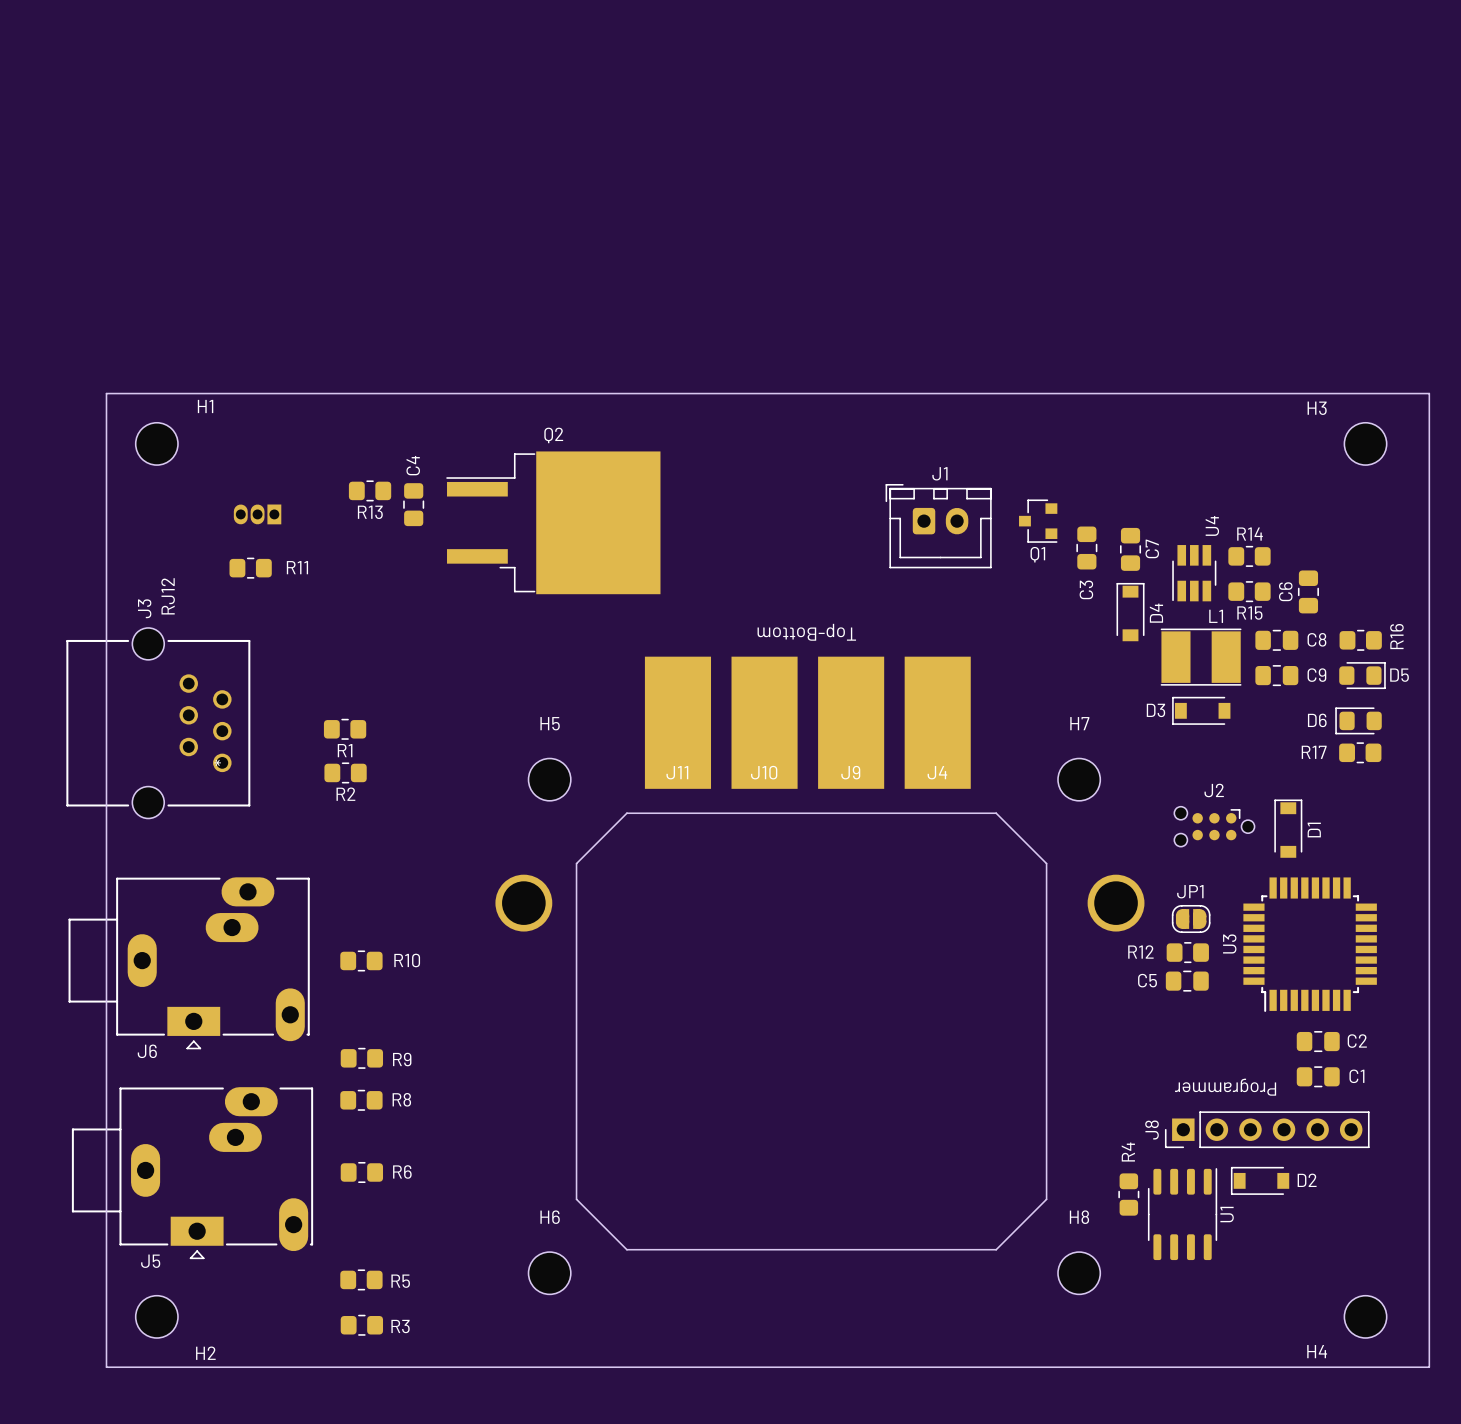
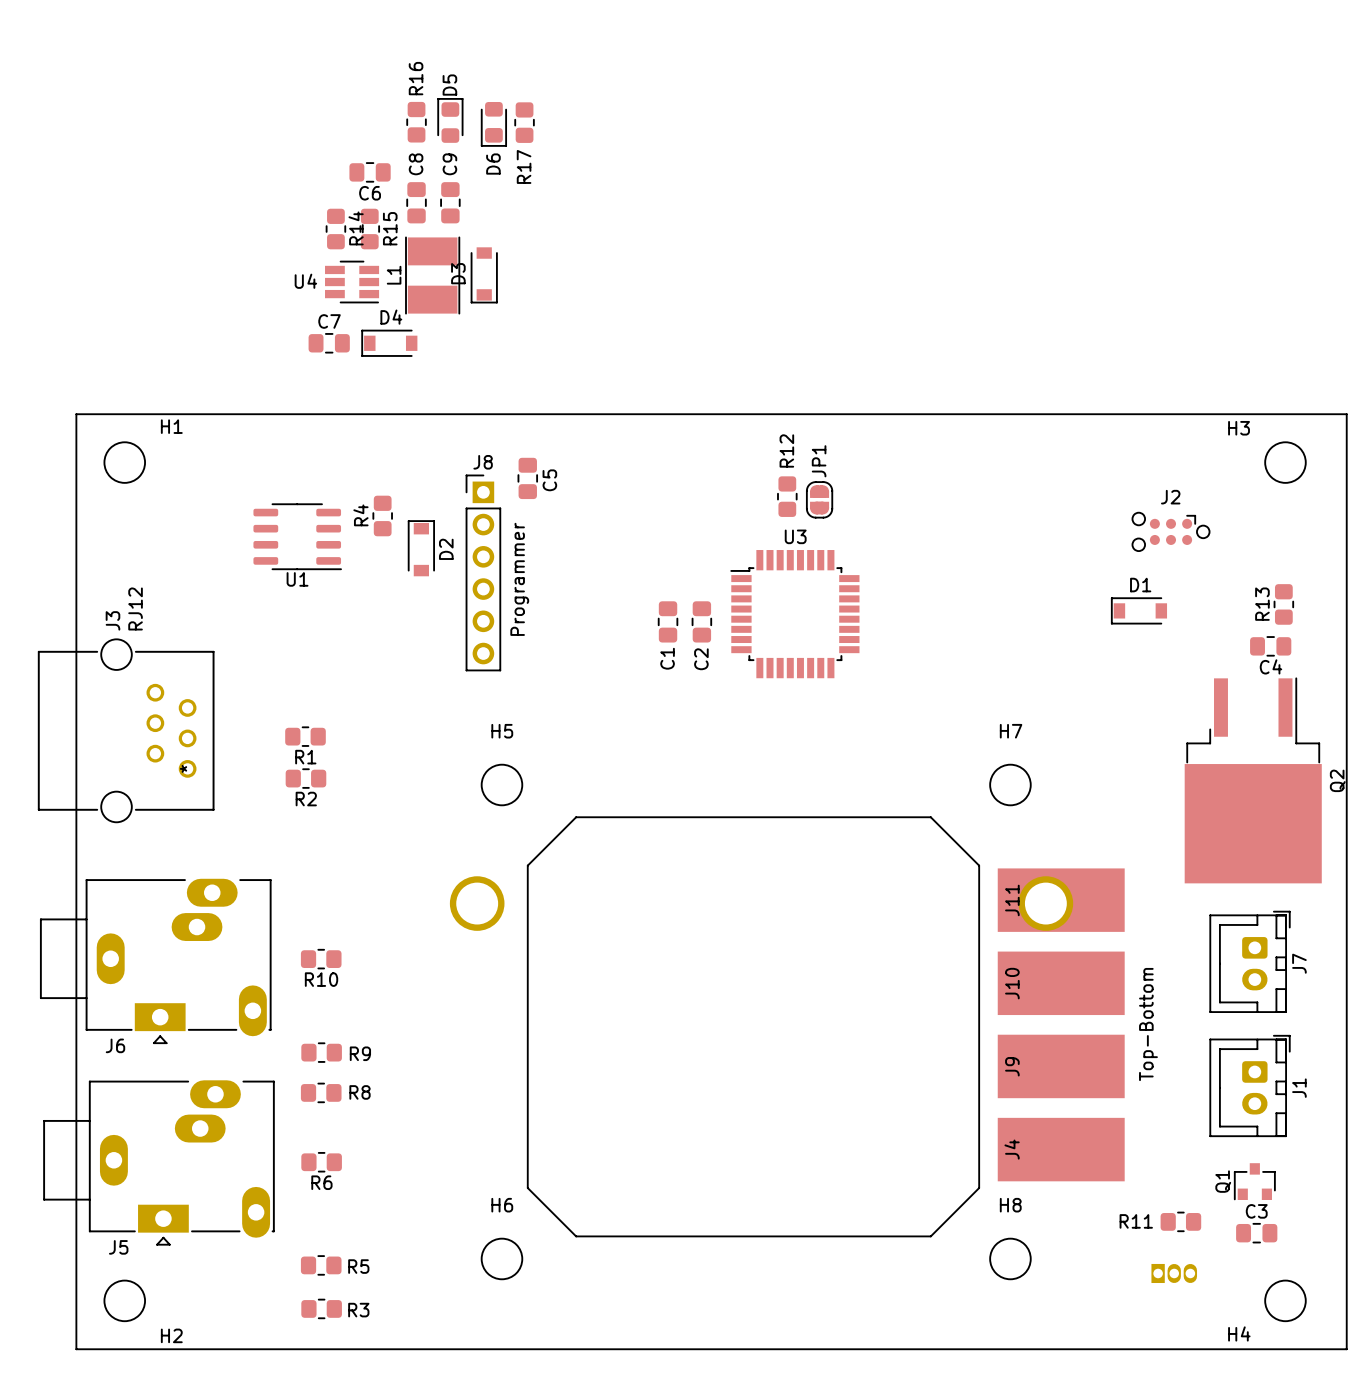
C4 name position: C4 (413, 465) -> C4 (1270, 666)
R13 rotation: 0° (370, 490) -> 90° clockwise (1283, 604)
R13 position: (370, 490) -> (1283, 604)
C4 rotation: 0° (413, 504) -> 90° clockwise (1270, 646)
C4 position: (413, 504) -> (1270, 646)
part: (257, 514) -> none
Q1 rotation: 0° (1038, 521) -> 90° clockwise (1254, 1181)
Q1 position: (1038, 521) -> (1254, 1181)
Q2 rotation: 0° (553, 522) -> 90° clockwise (1253, 780)
Q2 position: (553, 522) -> (1253, 780)
J1 rotation: 0° (938, 526) -> 90° clockwise (1250, 1085)
J1 position: (938, 526) -> (1250, 1085)
C3 rotation: 0° (1086, 548) -> 90° clockwise (1256, 1233)
C3 position: (1086, 548) -> (1256, 1233)
C7 name position: C7 (1152, 548) -> C7 (329, 321)
C7 rotation: 0° (1130, 549) -> 90° clockwise (329, 343)
C7 position: (1130, 549) -> (329, 343)
R14 rotation: 0° (1249, 556) -> 90° clockwise (335, 229)
R14 position: (1249, 556) -> (335, 229)
text: none -> Programmer (519, 579)
R11 name position: R11 (297, 567) -> R11 (1136, 1221)
R11 position: (250, 568) -> (1180, 1221)
U4 rotation: 0° (1194, 573) -> 90° counterclockwise (352, 282)
U4 position: (1194, 573) -> (352, 282)
C3 name position: C3 (1086, 589) -> C3 (1256, 1211)
R15 rotation: 0° (1249, 591) -> 90° clockwise (369, 229)
R15 position: (1249, 591) -> (369, 229)
C6 name position: C6 (1285, 591) -> C6 (370, 193)
C6 rotation: 0° (1308, 591) -> 90° clockwise (370, 172)
C6 position: (1308, 591) -> (370, 172)
D4 rotation: 0° (1130, 612) -> 90° counterclockwise (389, 343)
D4 position: (1130, 612) -> (389, 343)
R15 name position: R15 (1249, 613) -> R15 (390, 228)
L1 name position: L1 (1216, 616) -> L1 (394, 275)
text: Top-Bottom (806, 632) -> none
R16 name position: R16 (1396, 636) -> R16 (416, 78)
C8 name position: C8 (1316, 639) -> C8 (416, 164)
C8 rotation: 0° (1276, 640) -> 90° clockwise (416, 202)
C8 position: (1276, 640) -> (416, 202)
R16 rotation: 0° (1360, 640) -> 90° clockwise (416, 122)
R16 position: (1360, 640) -> (416, 122)
L1 rotation: 0° (1201, 657) -> 90° clockwise (432, 275)
L1 position: (1201, 657) -> (432, 275)
C9 rotation: 0° (1276, 675) -> 90° clockwise (450, 202)
C9 position: (1276, 675) -> (450, 202)
C9 name position: C9 (1316, 675) -> C9 (449, 164)
D5 rotation: 0° (1362, 675) -> 90° counterclockwise (450, 120)
D5 position: (1362, 675) -> (450, 120)
D3 rotation: 0° (1201, 710) -> 90° counterclockwise (484, 275)
D3 position: (1201, 710) -> (484, 275)
D6 rotation: 0° (1358, 720) -> 90° counterclockwise (493, 124)
D6 position: (1358, 720) -> (493, 124)
J11 rotation: 0° (677, 722) -> 90° clockwise (1061, 900)
J11 position: (677, 722) -> (1061, 900)
J10 rotation: 0° (764, 722) -> 90° clockwise (1061, 983)
J10 position: (764, 722) -> (1061, 983)
J9 rotation: 0° (851, 722) -> 90° clockwise (1061, 1066)
J9 position: (851, 722) -> (1061, 1066)
J4 rotation: 0° (937, 722) -> 90° clockwise (1061, 1149)
J4 position: (937, 722) -> (1061, 1149)
R17 name position: R17 (1314, 752) -> R17 (524, 166)
R17 rotation: 0° (1360, 752) -> 90° clockwise (524, 122)
R17 position: (1360, 752) -> (524, 122)
J2 position: (1214, 826) -> (1171, 531)
D1 rotation: 0° (1288, 828) -> 90° counterclockwise (1139, 610)
D1 position: (1288, 828) -> (1139, 610)
JP1 rotation: 0° (1191, 919) -> 90° clockwise (819, 499)
JP1 position: (1191, 919) -> (819, 499)
U3 rotation: 0° (1310, 944) -> 90° clockwise (794, 614)
U3 position: (1310, 944) -> (794, 614)
R12 rotation: 0° (1187, 952) -> 90° clockwise (787, 496)
R12 position: (1187, 952) -> (787, 496)
R10 name position: R10 (407, 960) -> R10 (321, 979)
J7: none -> (1250, 961)
C5 name position: C5 (1147, 980) -> C5 (549, 480)
C5 rotation: 0° (1187, 981) -> 90° clockwise (527, 478)
C5 position: (1187, 981) -> (527, 478)
text: none -> Top-Bottom (1148, 1024)
C2 rotation: 0° (1318, 1041) -> 90° clockwise (701, 621)
C2 position: (1318, 1041) -> (701, 621)
C1 rotation: 0° (1318, 1076) -> 90° clockwise (668, 621)
C1 position: (1318, 1076) -> (668, 621)
text: Programmer (1225, 1087) -> none
J8 rotation: 0° (1267, 1129) -> 90° clockwise (483, 572)
J8 position: (1267, 1129) -> (483, 572)
R4 name position: R4 (1128, 1152) -> R4 (360, 515)
R6 name position: R6 (402, 1171) -> R6 (321, 1182)
D2 rotation: 0° (1260, 1180) -> 90° clockwise (421, 548)
D2 position: (1260, 1180) -> (421, 548)
R4 position: (1128, 1194) -> (382, 515)
U1 rotation: 0° (1182, 1214) -> 90° clockwise (297, 536)
U1 position: (1182, 1214) -> (297, 536)
part: none -> (1174, 1273)

